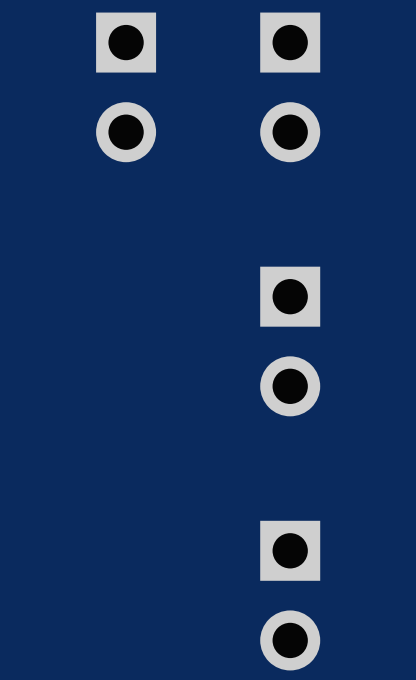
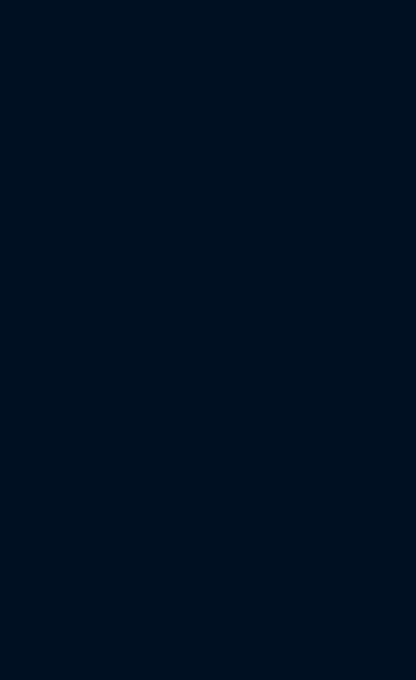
part: (126, 87) -> none
part: (290, 87) -> none
part: (290, 341) -> none
part: (290, 595) -> none

